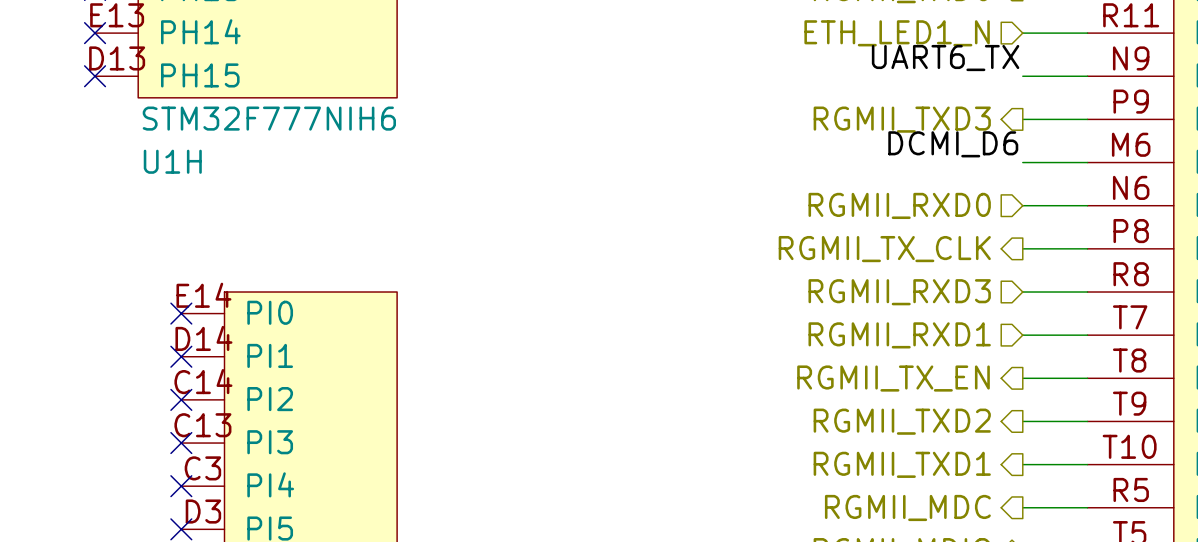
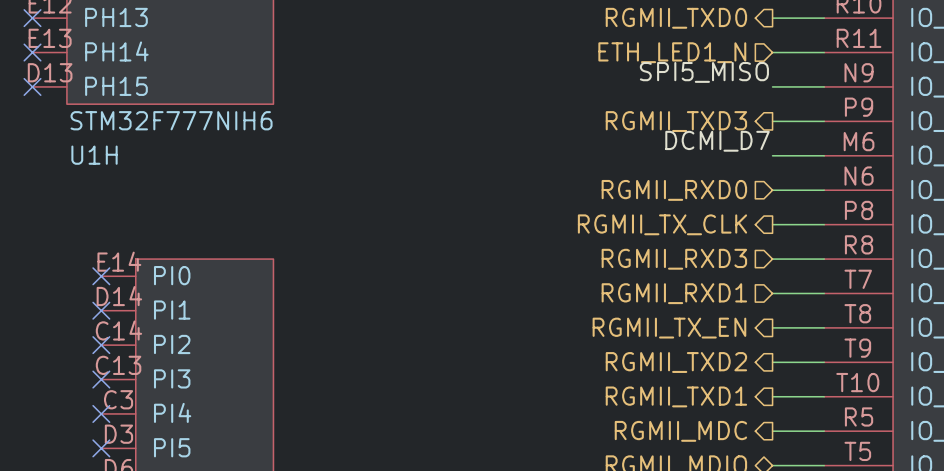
label: UART6_TX (945, 58) -> SPI5_MISO (704, 72)
label: DCMI_D6 (953, 144) -> DCMI_D7 (717, 141)

